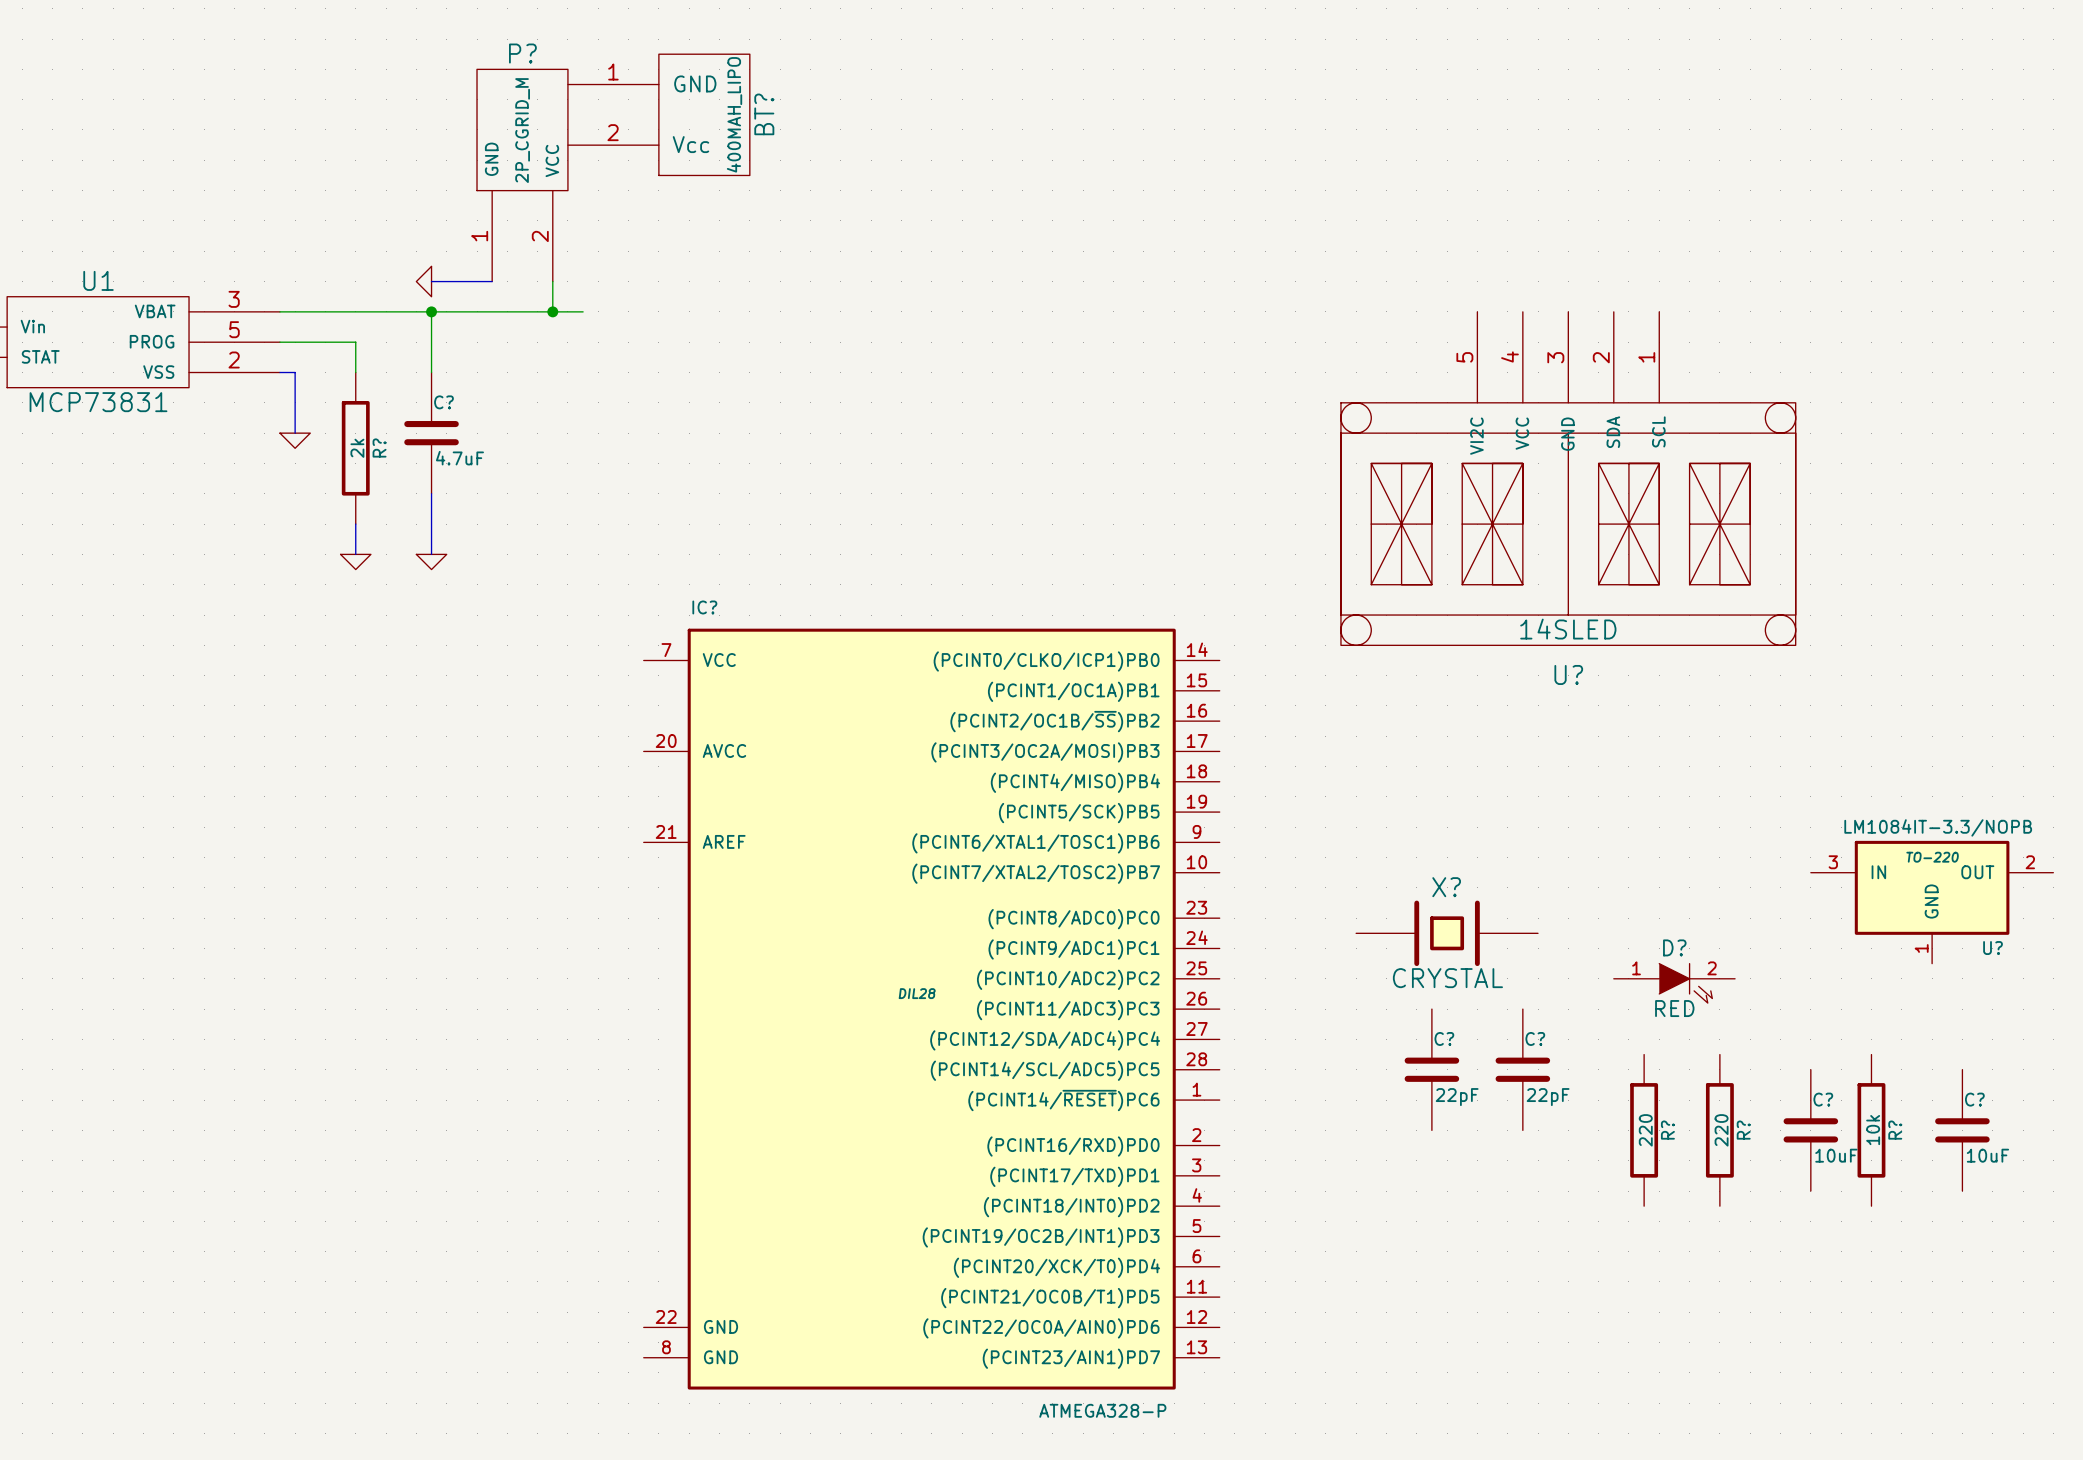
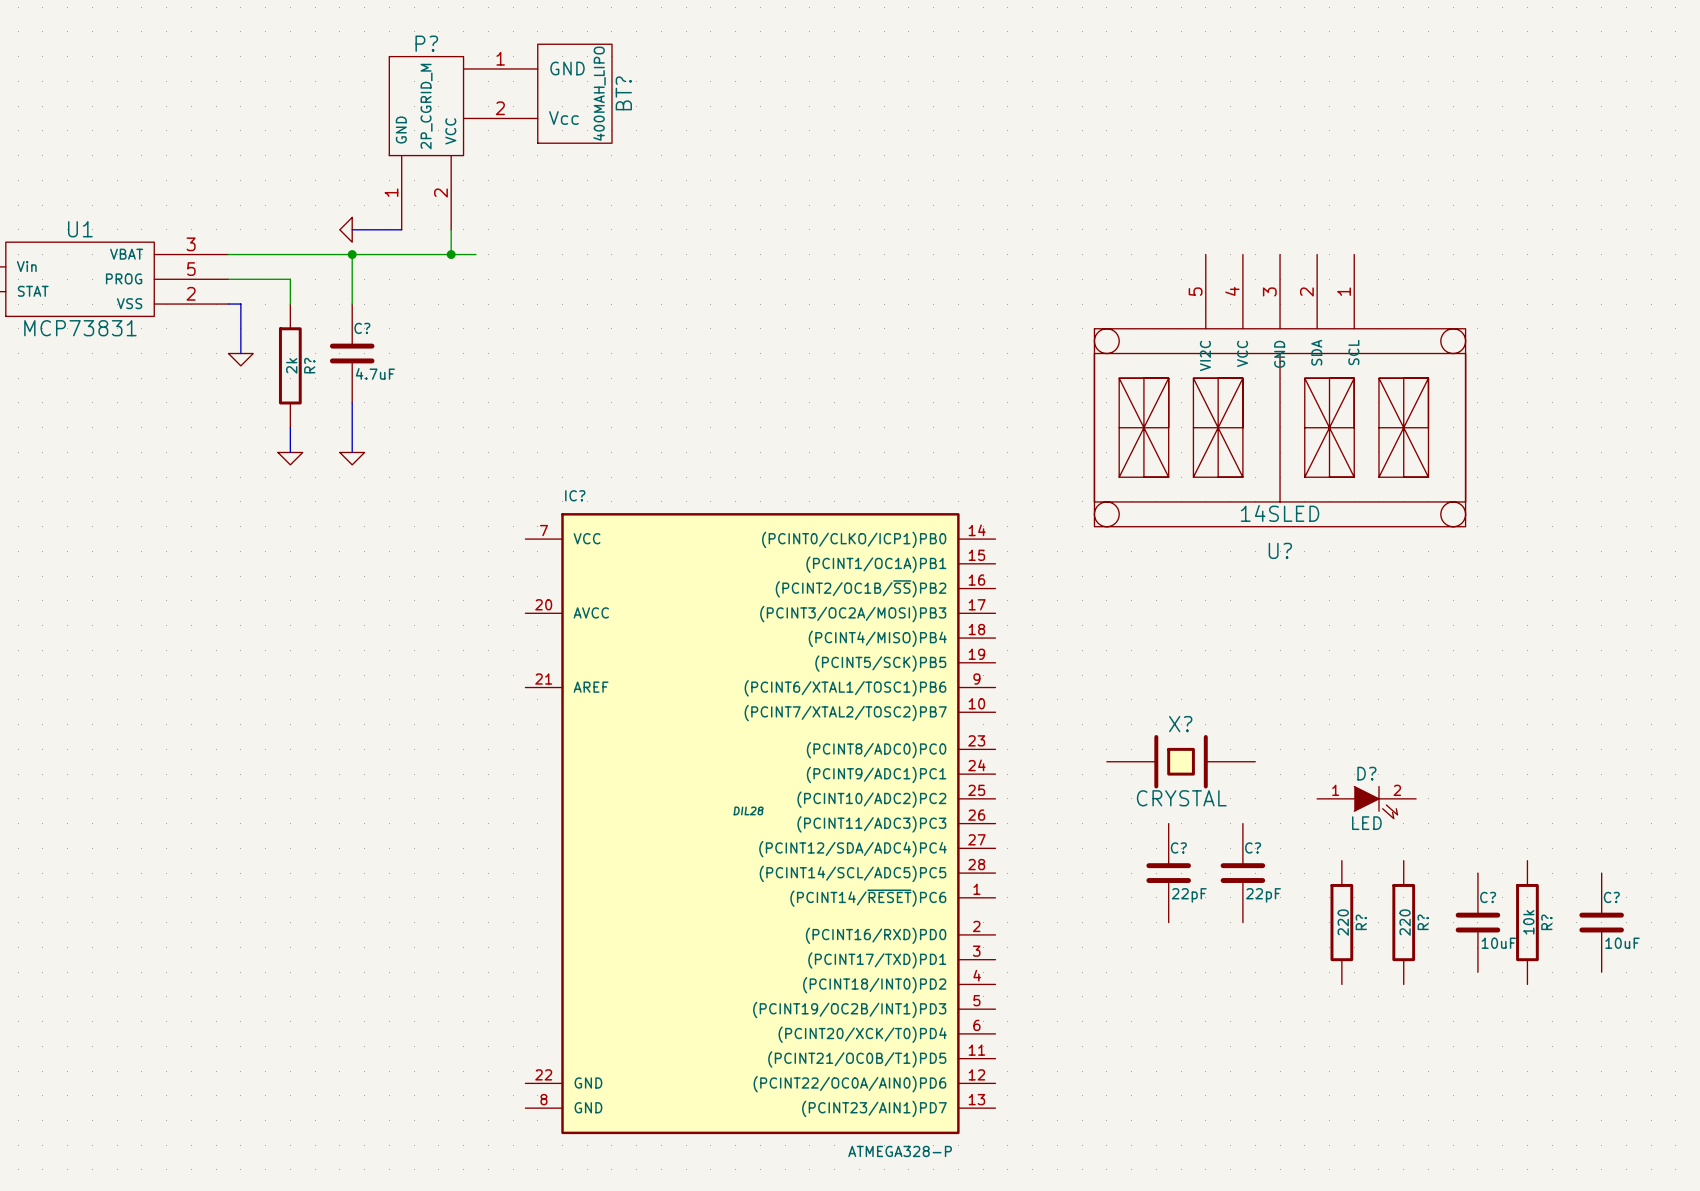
U?: LM1084IT-3.3/NOPB (1932, 902) -> none
D? value: RED (1674, 1008) -> LED (1366, 823)

